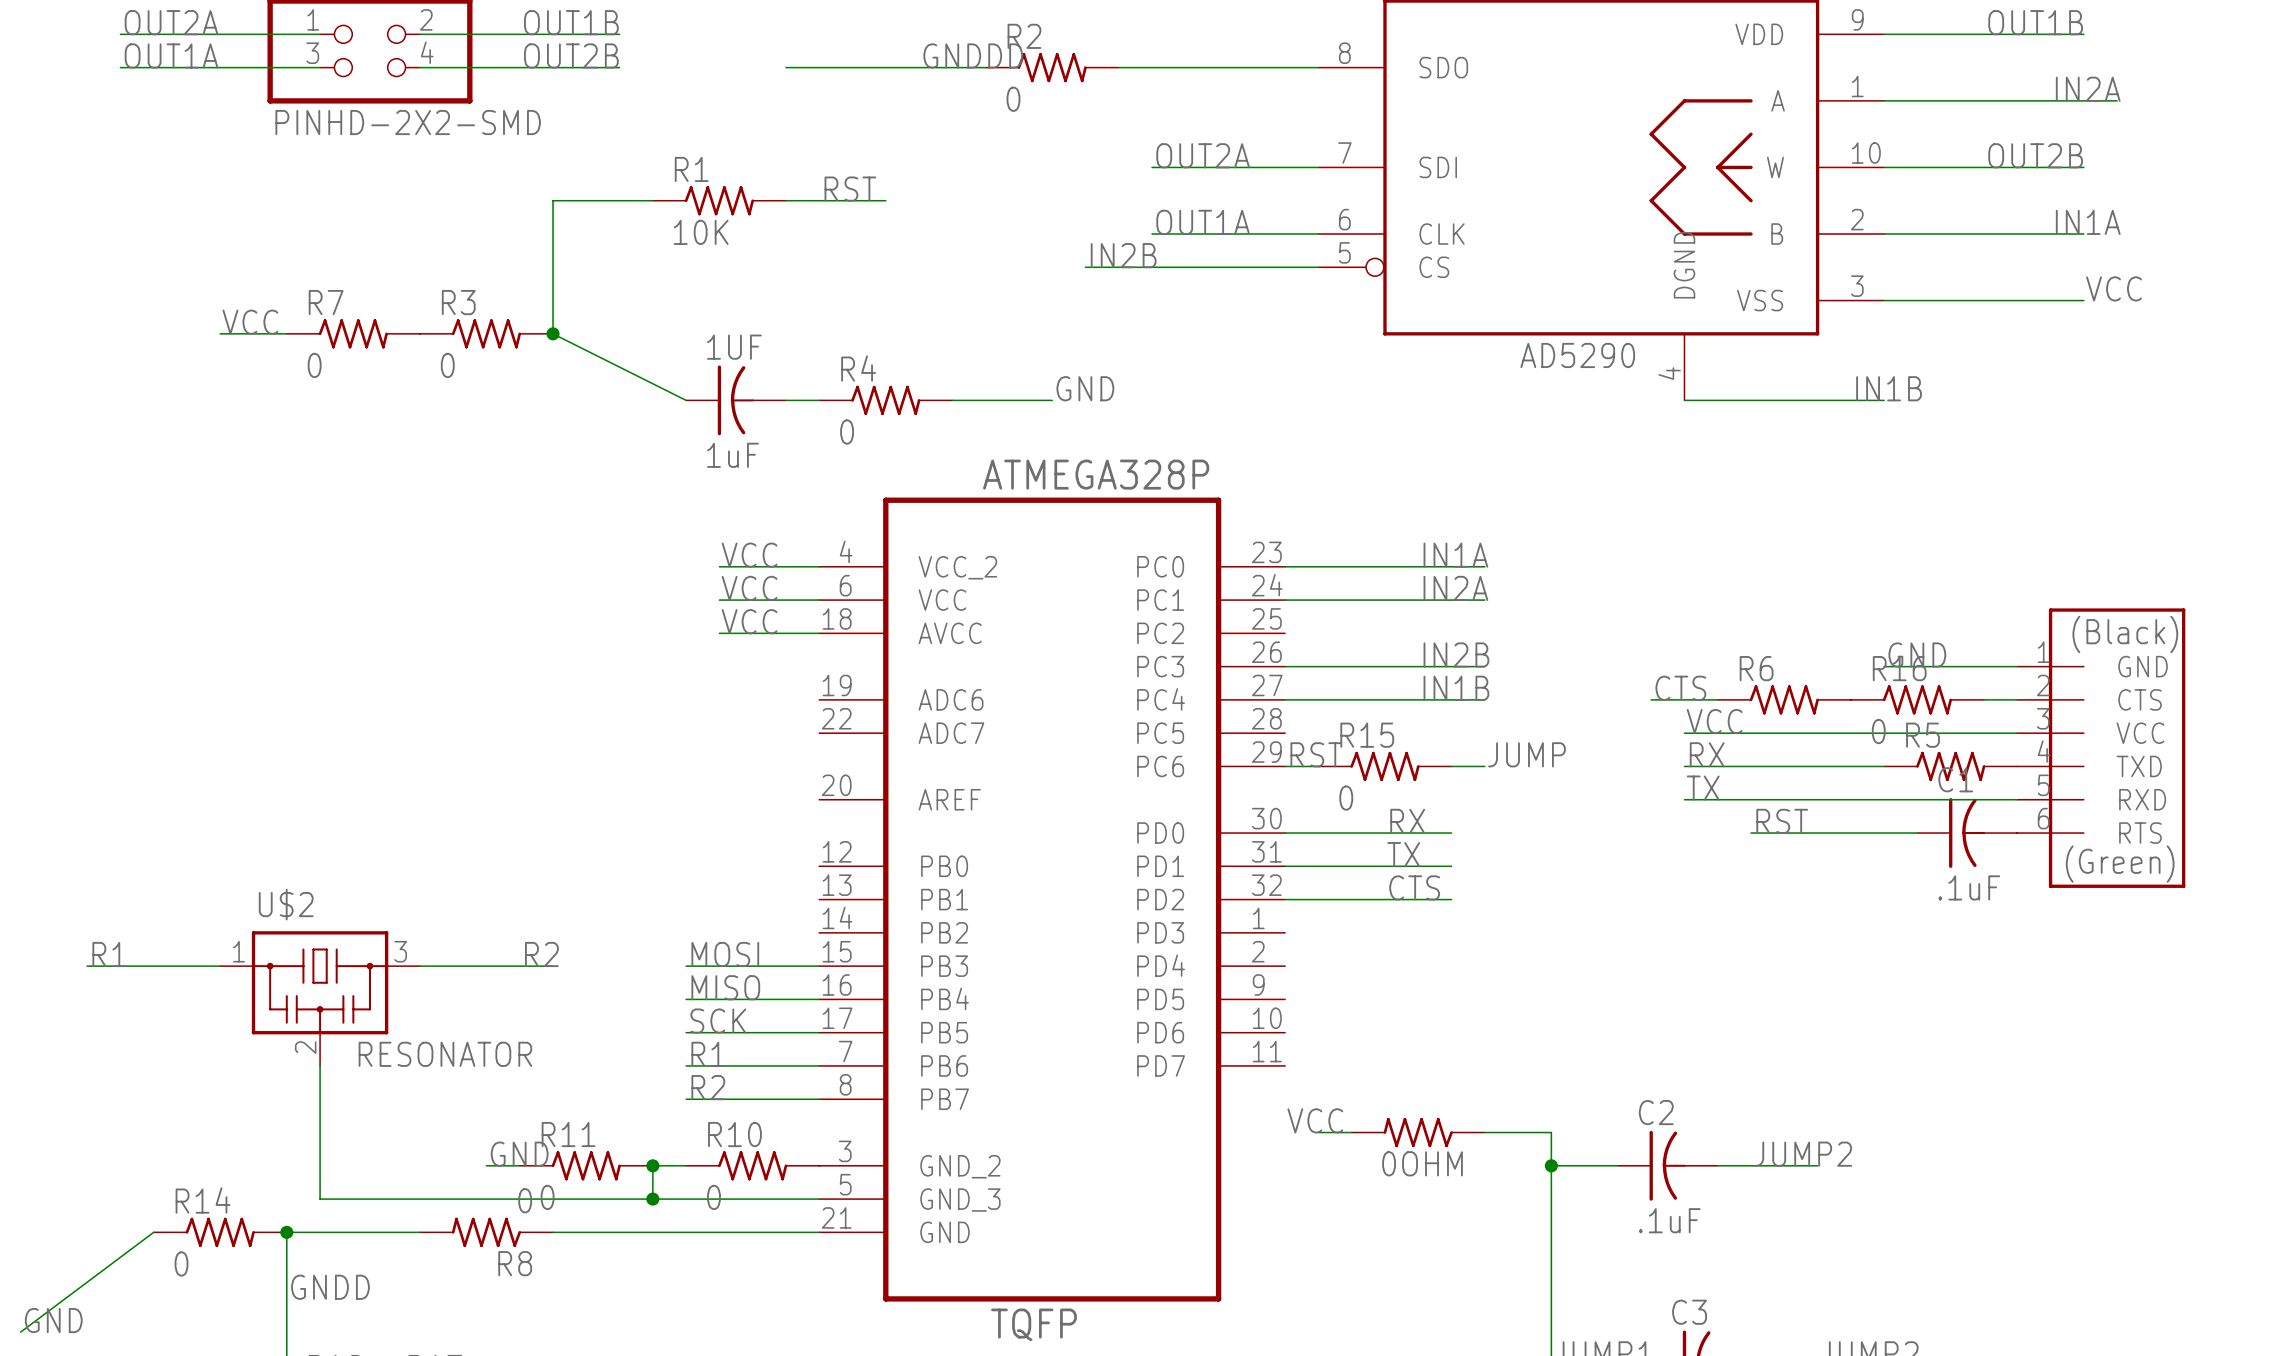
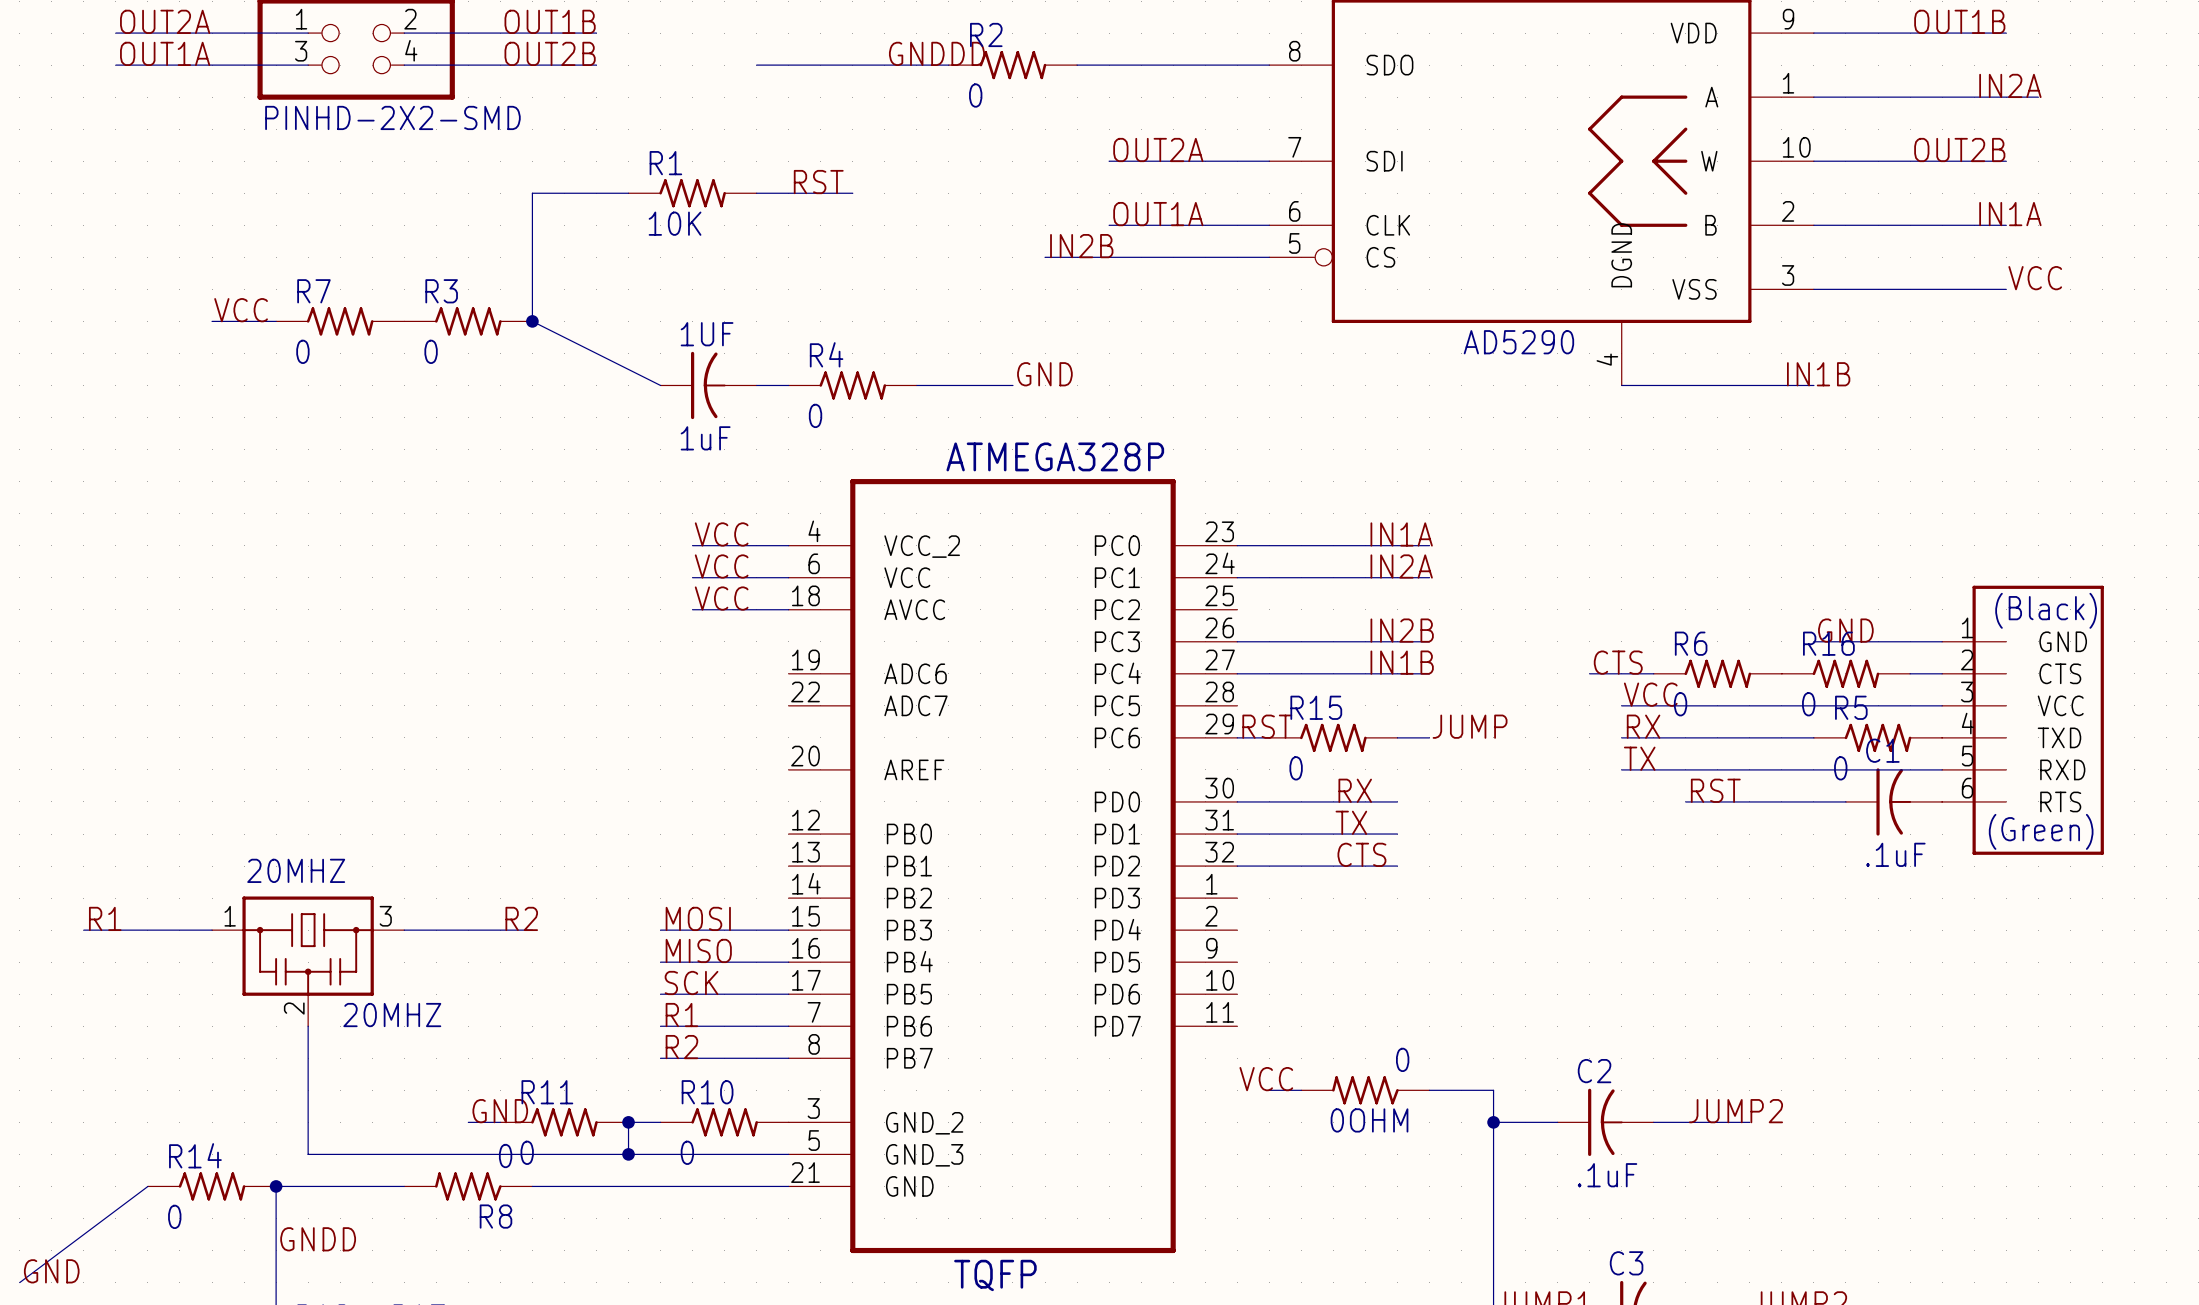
R6 value: none -> 0 (1680, 704)
R5 value: none -> 0 (1840, 768)
U$2 name: U$2 (286, 904) -> 20MHZ (296, 870)
U$2 value: RESONATOR (445, 1054) -> 20MHZ (392, 1015)
0OHM value: none -> 0 (1402, 1059)

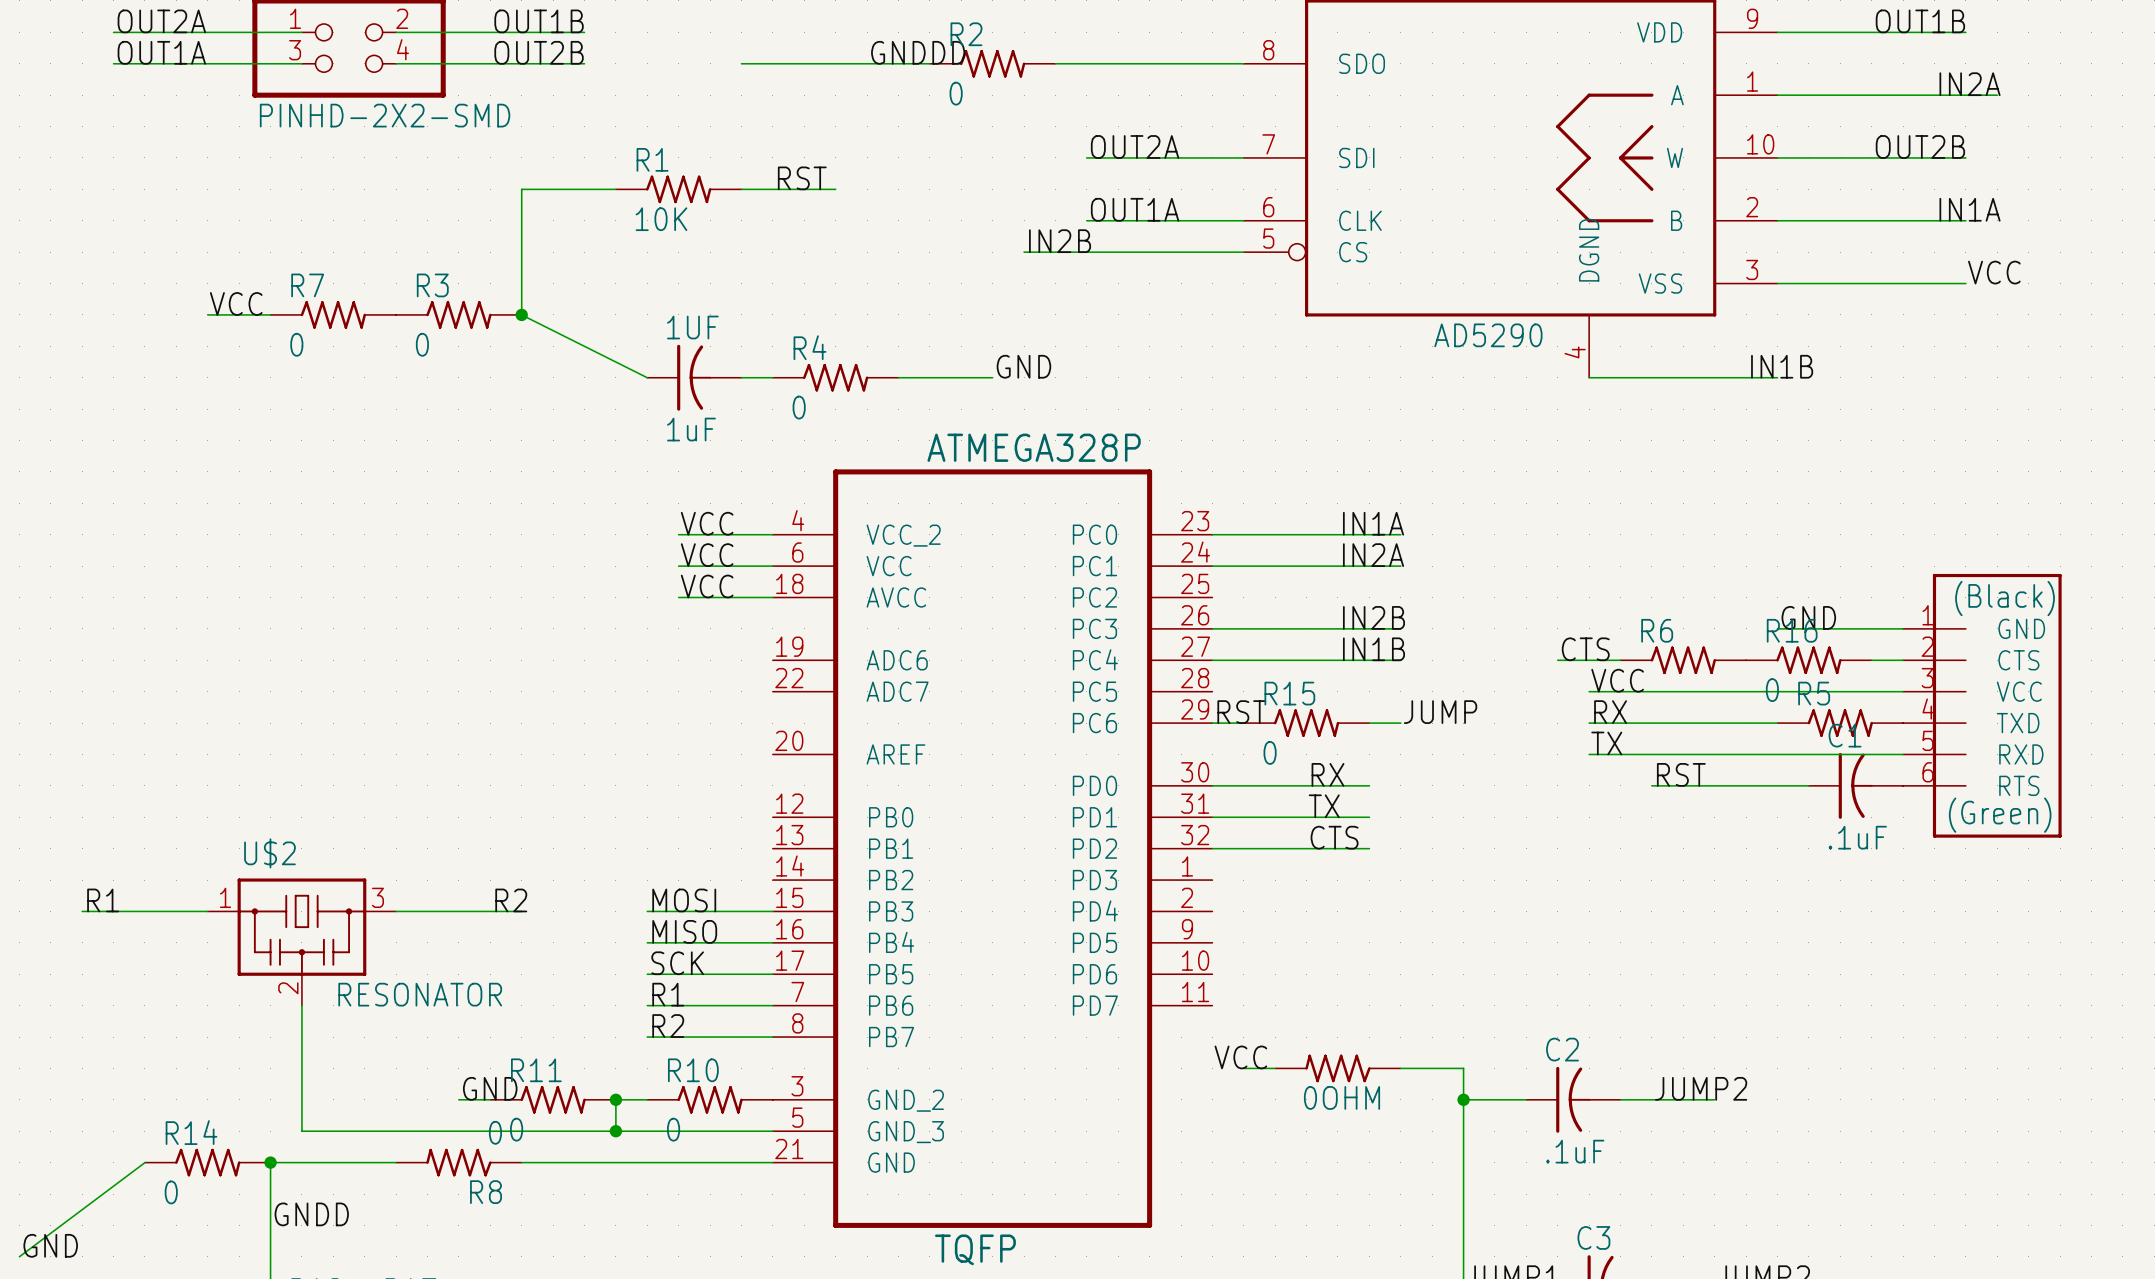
R6 value: 0 (1680, 704) -> none
R5 value: 0 (1840, 768) -> none
20MHZ name: 20MHZ (296, 870) -> U$2 (269, 853)
20MHZ value: 20MHZ (392, 1015) -> RESONATOR (420, 994)
0OHM value: 0 (1402, 1059) -> none

